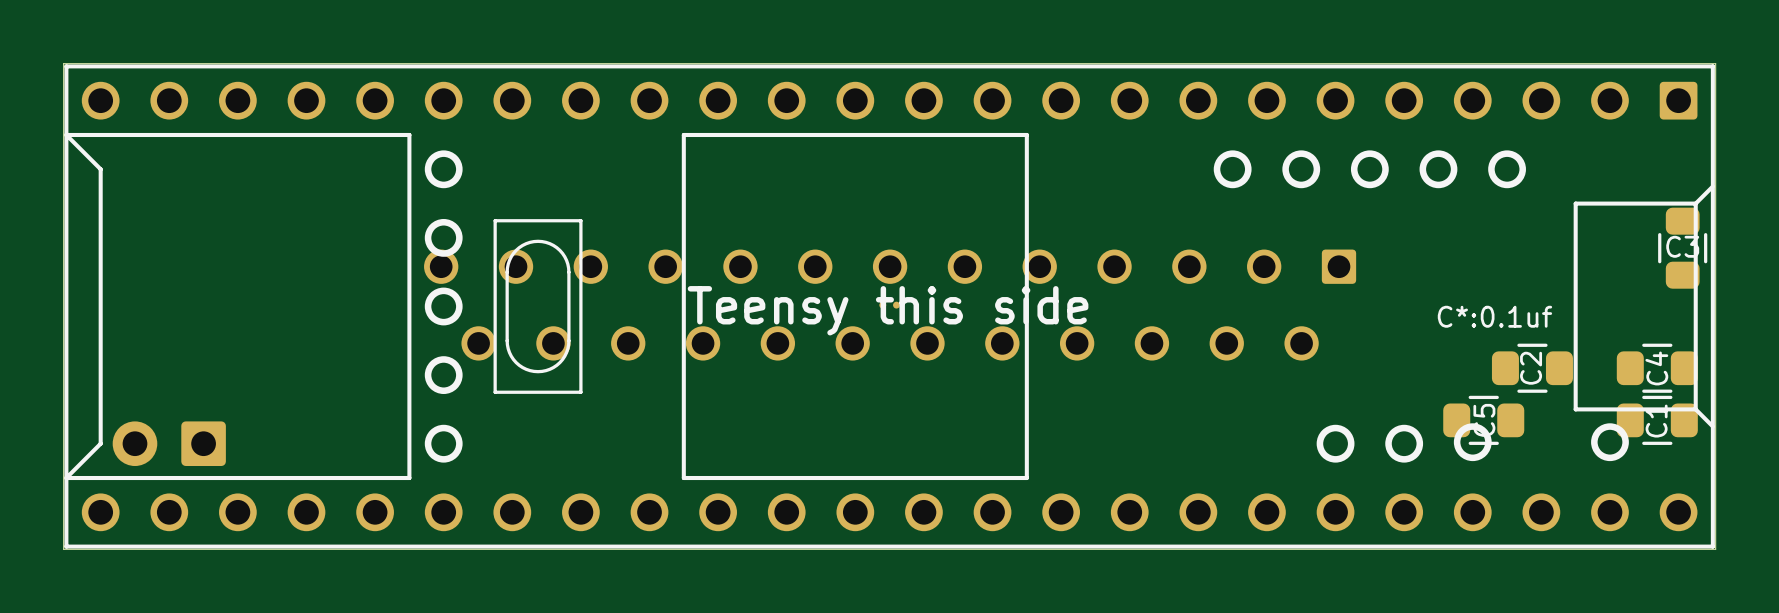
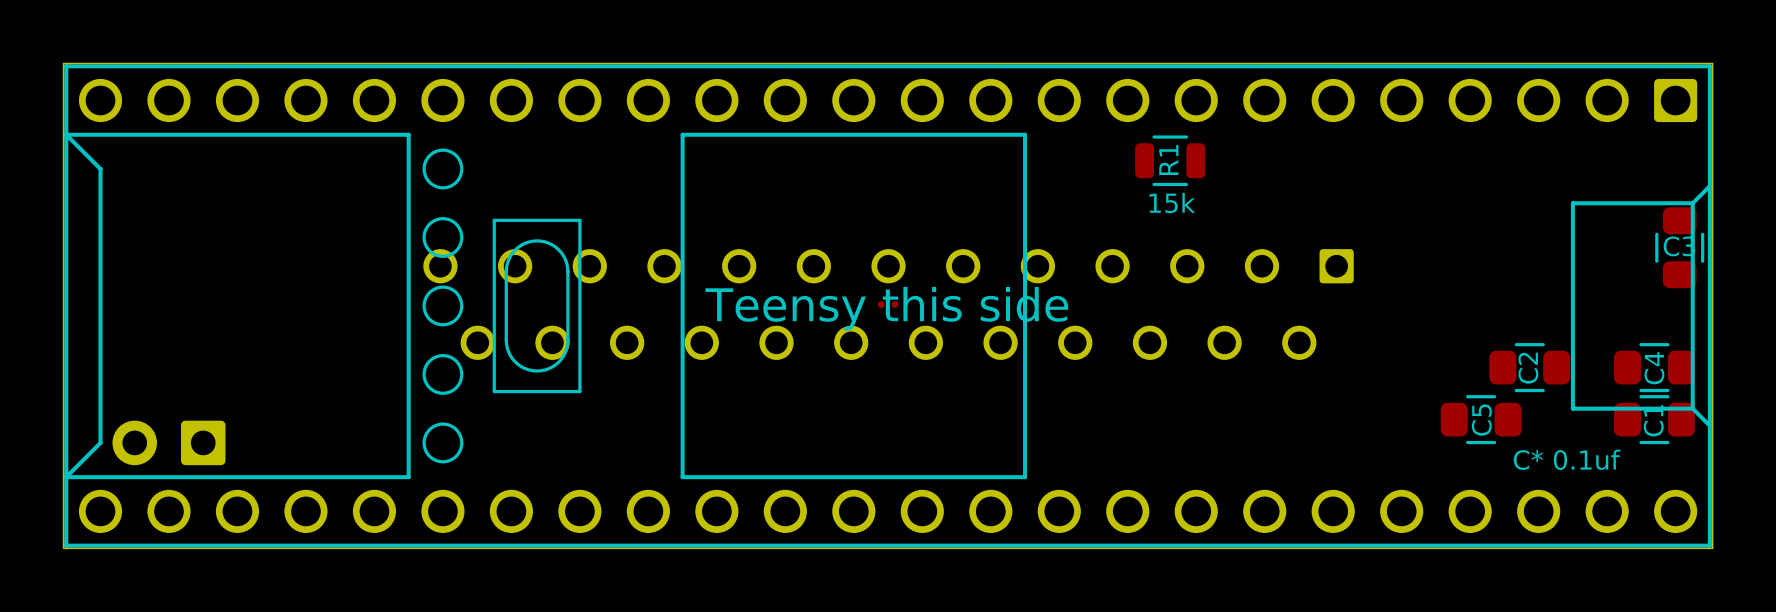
part footprint: [64, 64, 1715, 549] -> [64, 64, 1712, 548]
R1: none -> 15k (1170, 160)
text: C*:0.1uf (1494, 316) -> none
text: none -> C* 0.1uf (1567, 459)

